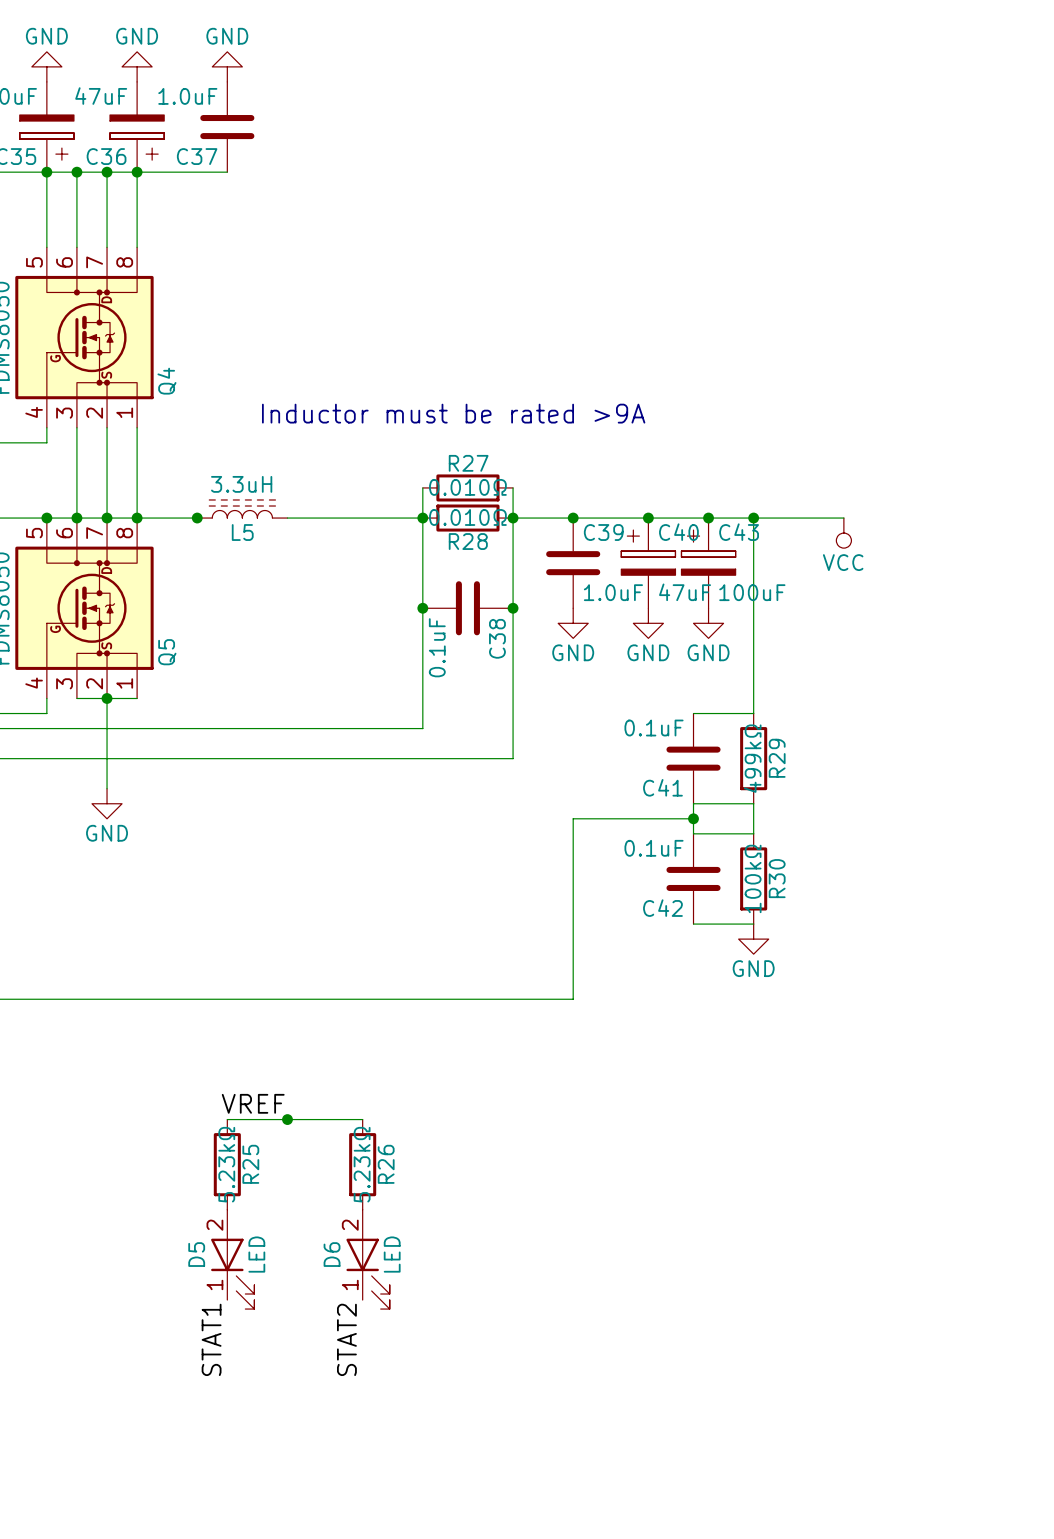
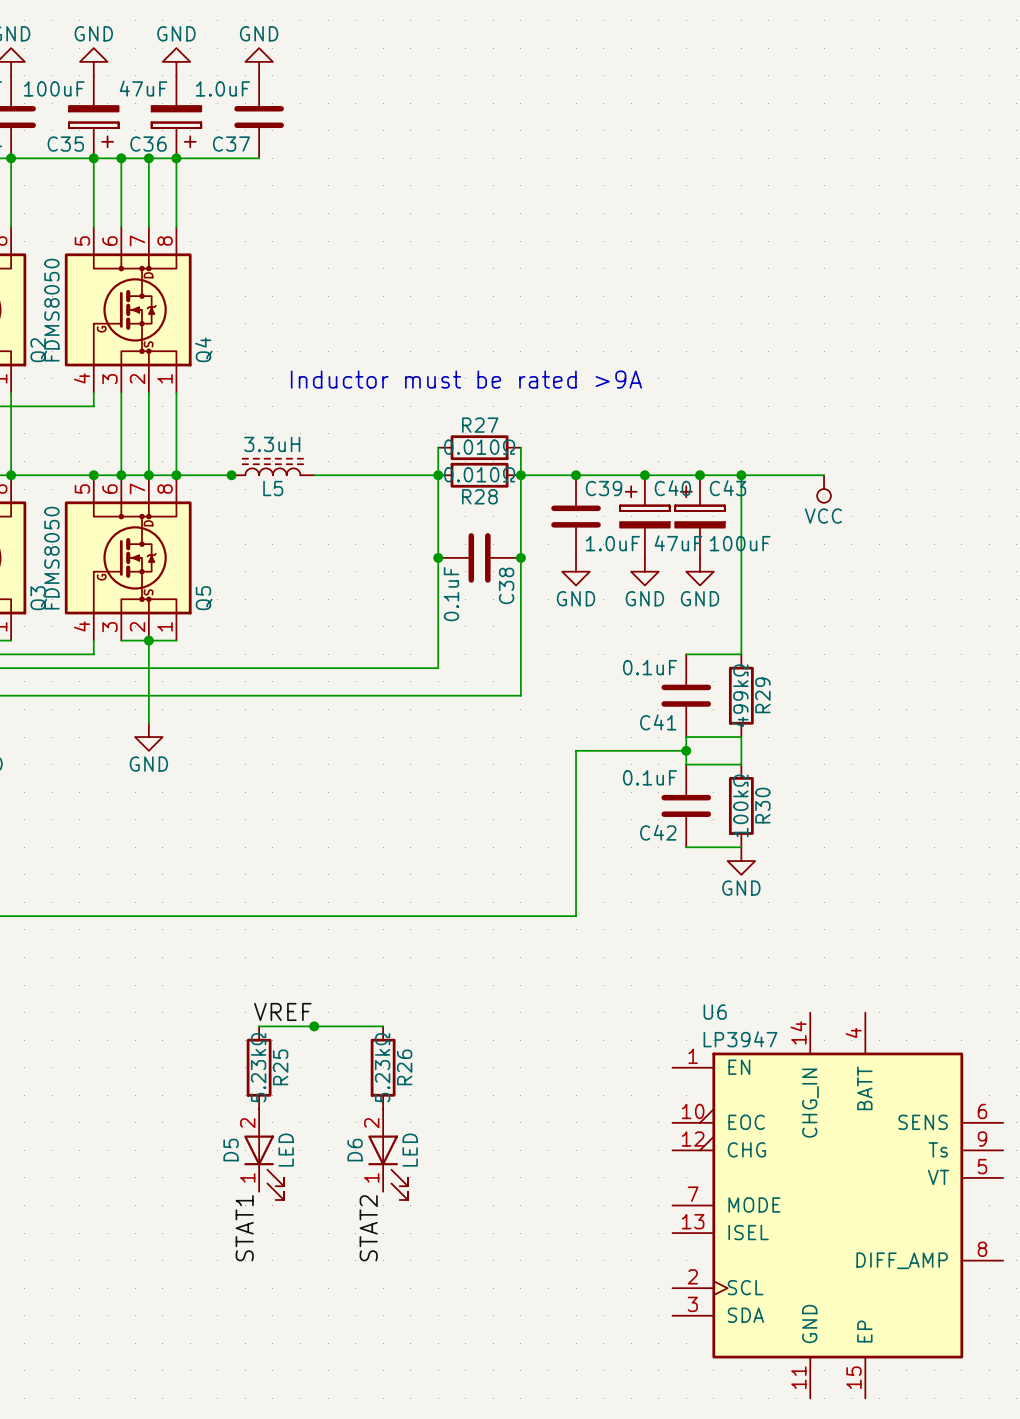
U6: none -> LP3947 (837, 1205)

